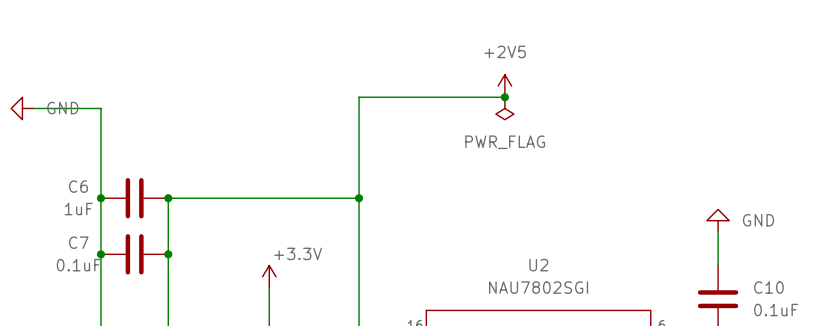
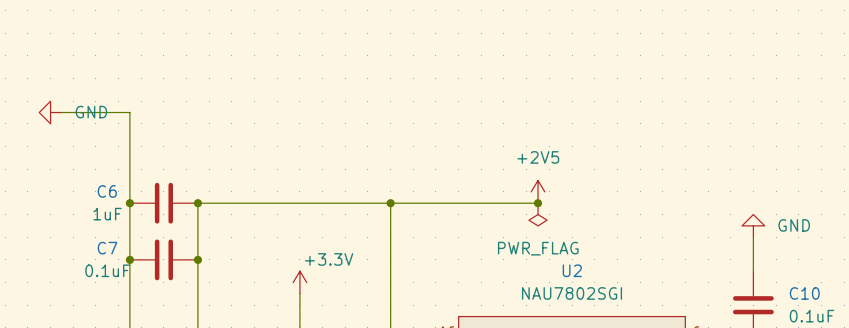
power symbol position: +2V5 (504, 86) -> +2V5 (538, 191)
wire: (504, 97) (359, 97) (359, 198) -> (538, 203) (390, 203)
junction: (504, 97) -> none
power symbol position: PWR_FLAG (504, 108) -> PWR_FLAG (538, 214)
junction: none -> (538, 203)

